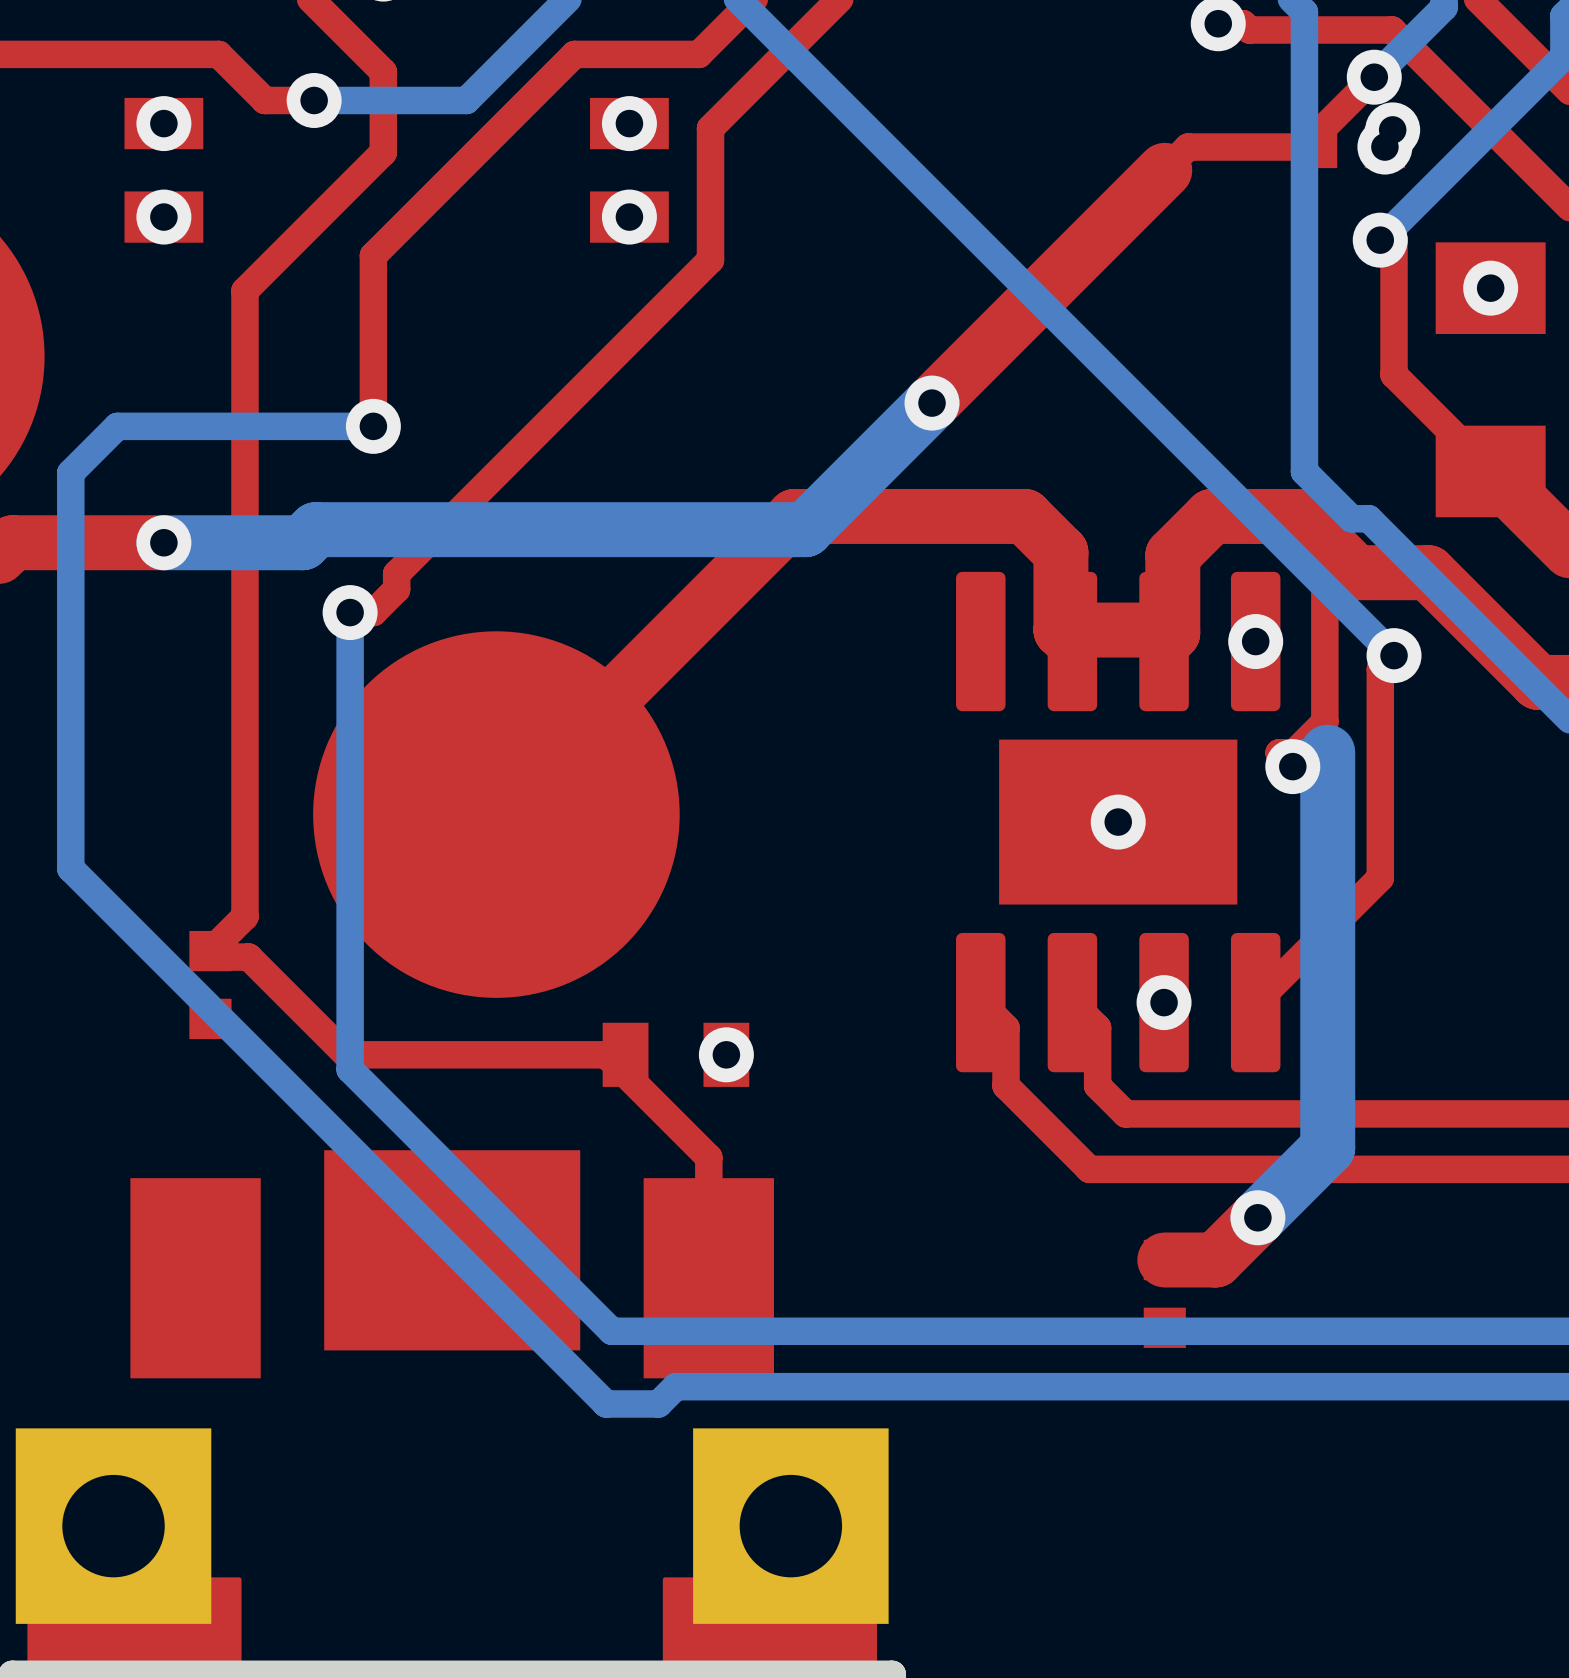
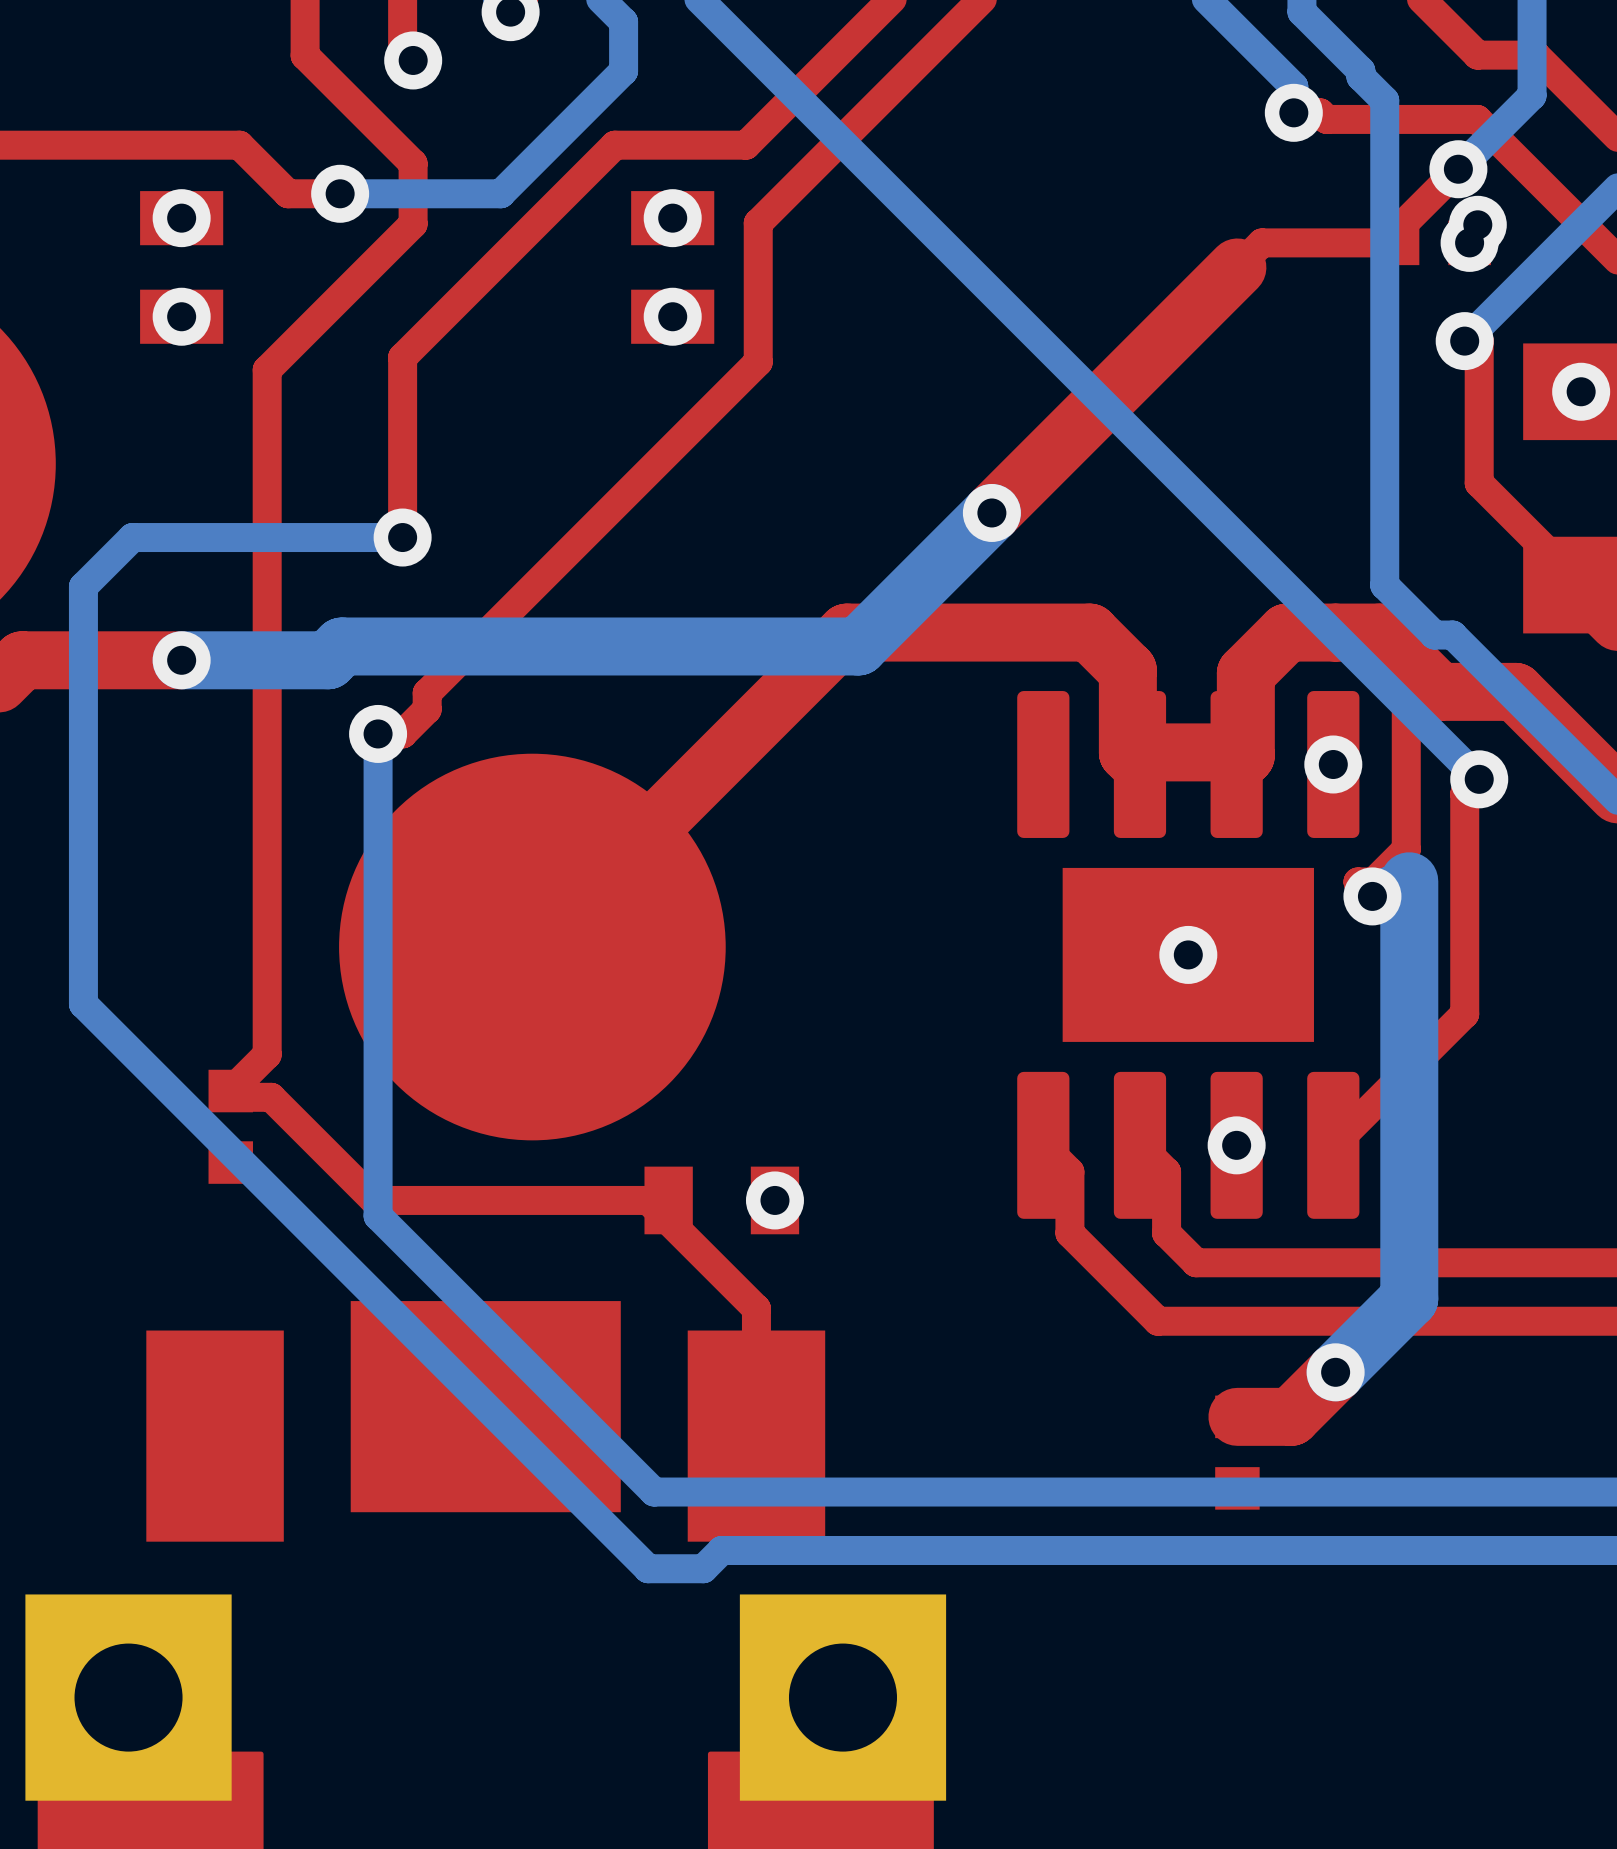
top track: (383, 129) (383, 152) (244, 290) -> (413, 224) (267, 369) (267, 394)

